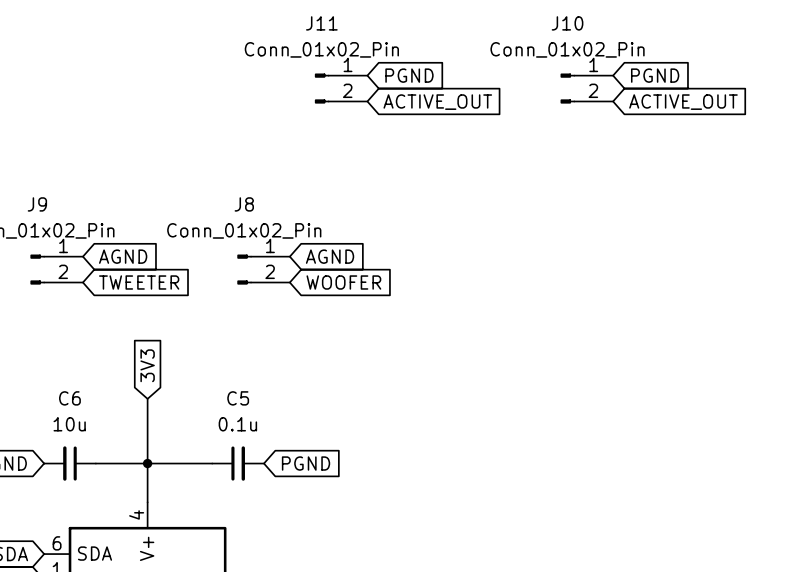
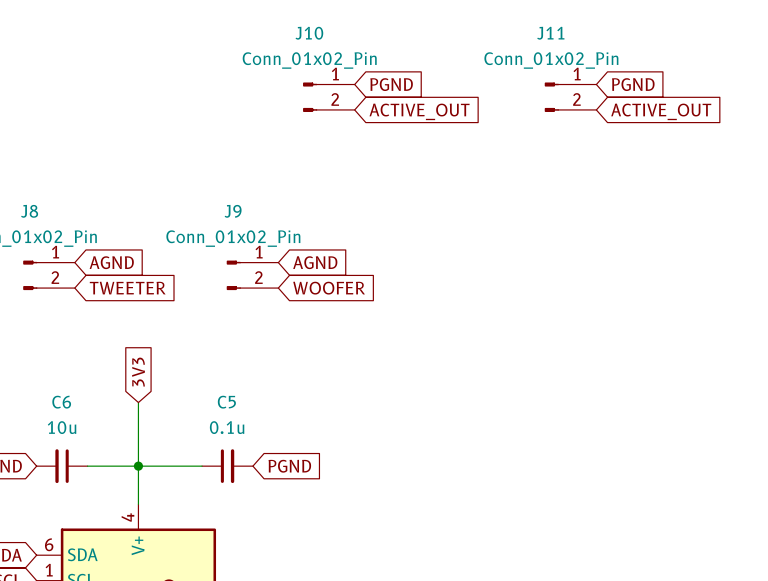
J11 name: J11 (321, 23) -> J10 (309, 33)
J10 name: J10 (567, 23) -> J11 (550, 33)
J9 name: J9 (37, 204) -> J8 (29, 211)
J8 name: J8 (244, 204) -> J9 (233, 211)

